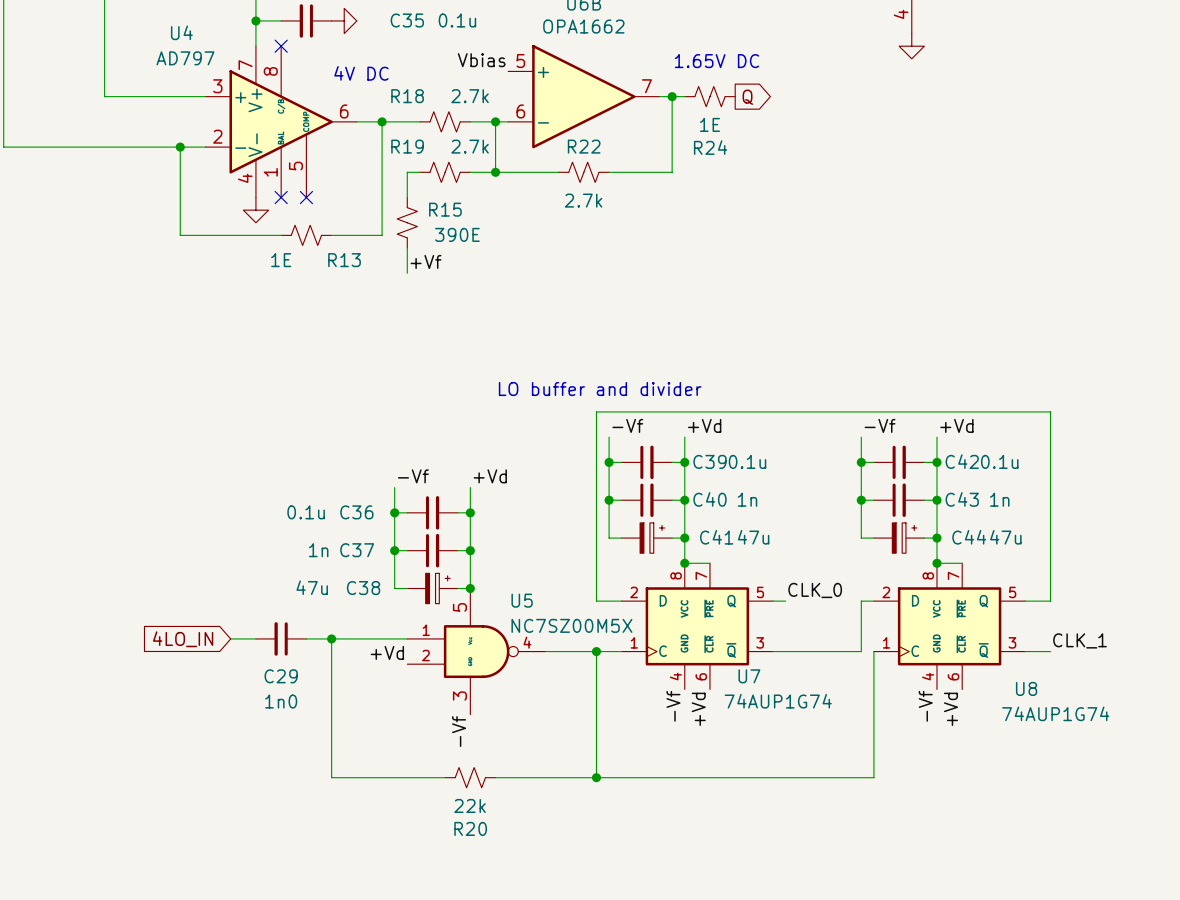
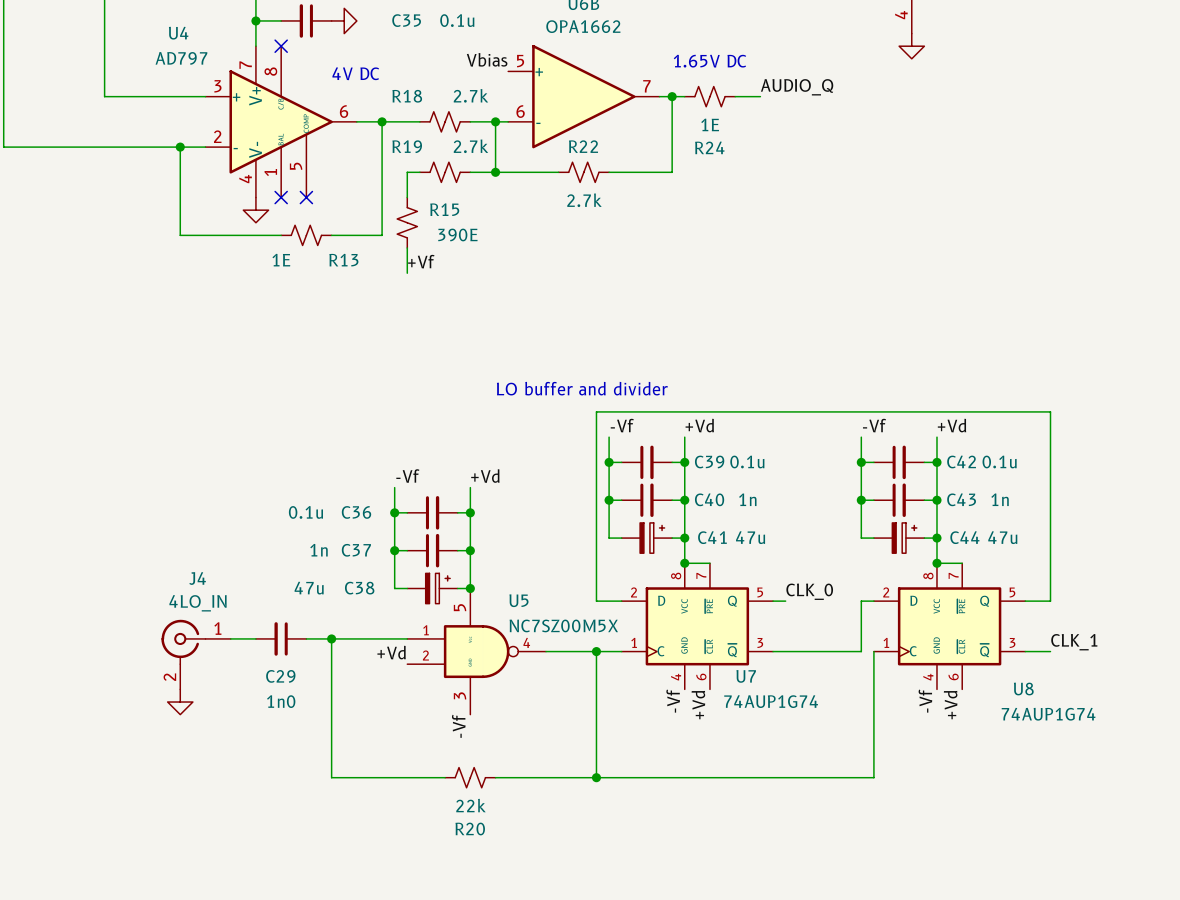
label: none -> AUDIO_Q (797, 87)
wire: none -> (735, 96) (760, 96)
global label: Q (747, 97) -> none
global label: 4LO_IN (183, 639) -> none
J4: none -> 4LO_IN (196, 654)
power symbol: none -> (180, 702)

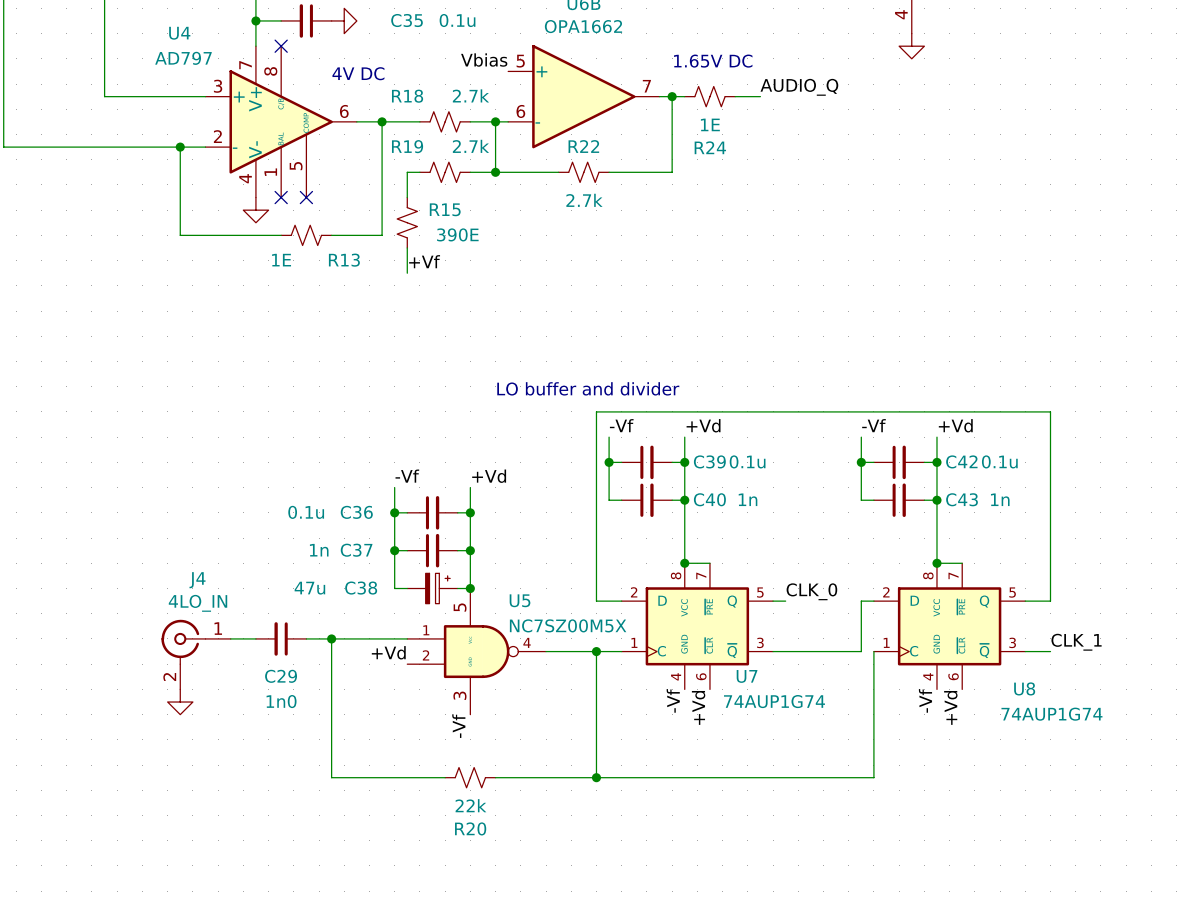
wire: (609, 500) (609, 538) (621, 538) -> none
junction: (609, 500) -> none
wire: (861, 500) (861, 538) (873, 538) -> none
junction: (861, 500) -> none
C41: 47u (646, 538) -> none
wire: (672, 538) (684, 538) -> none
junction: (684, 538) -> none
C44: 47u (899, 538) -> none
wire: (924, 538) (936, 538) -> none
junction: (936, 538) -> none

